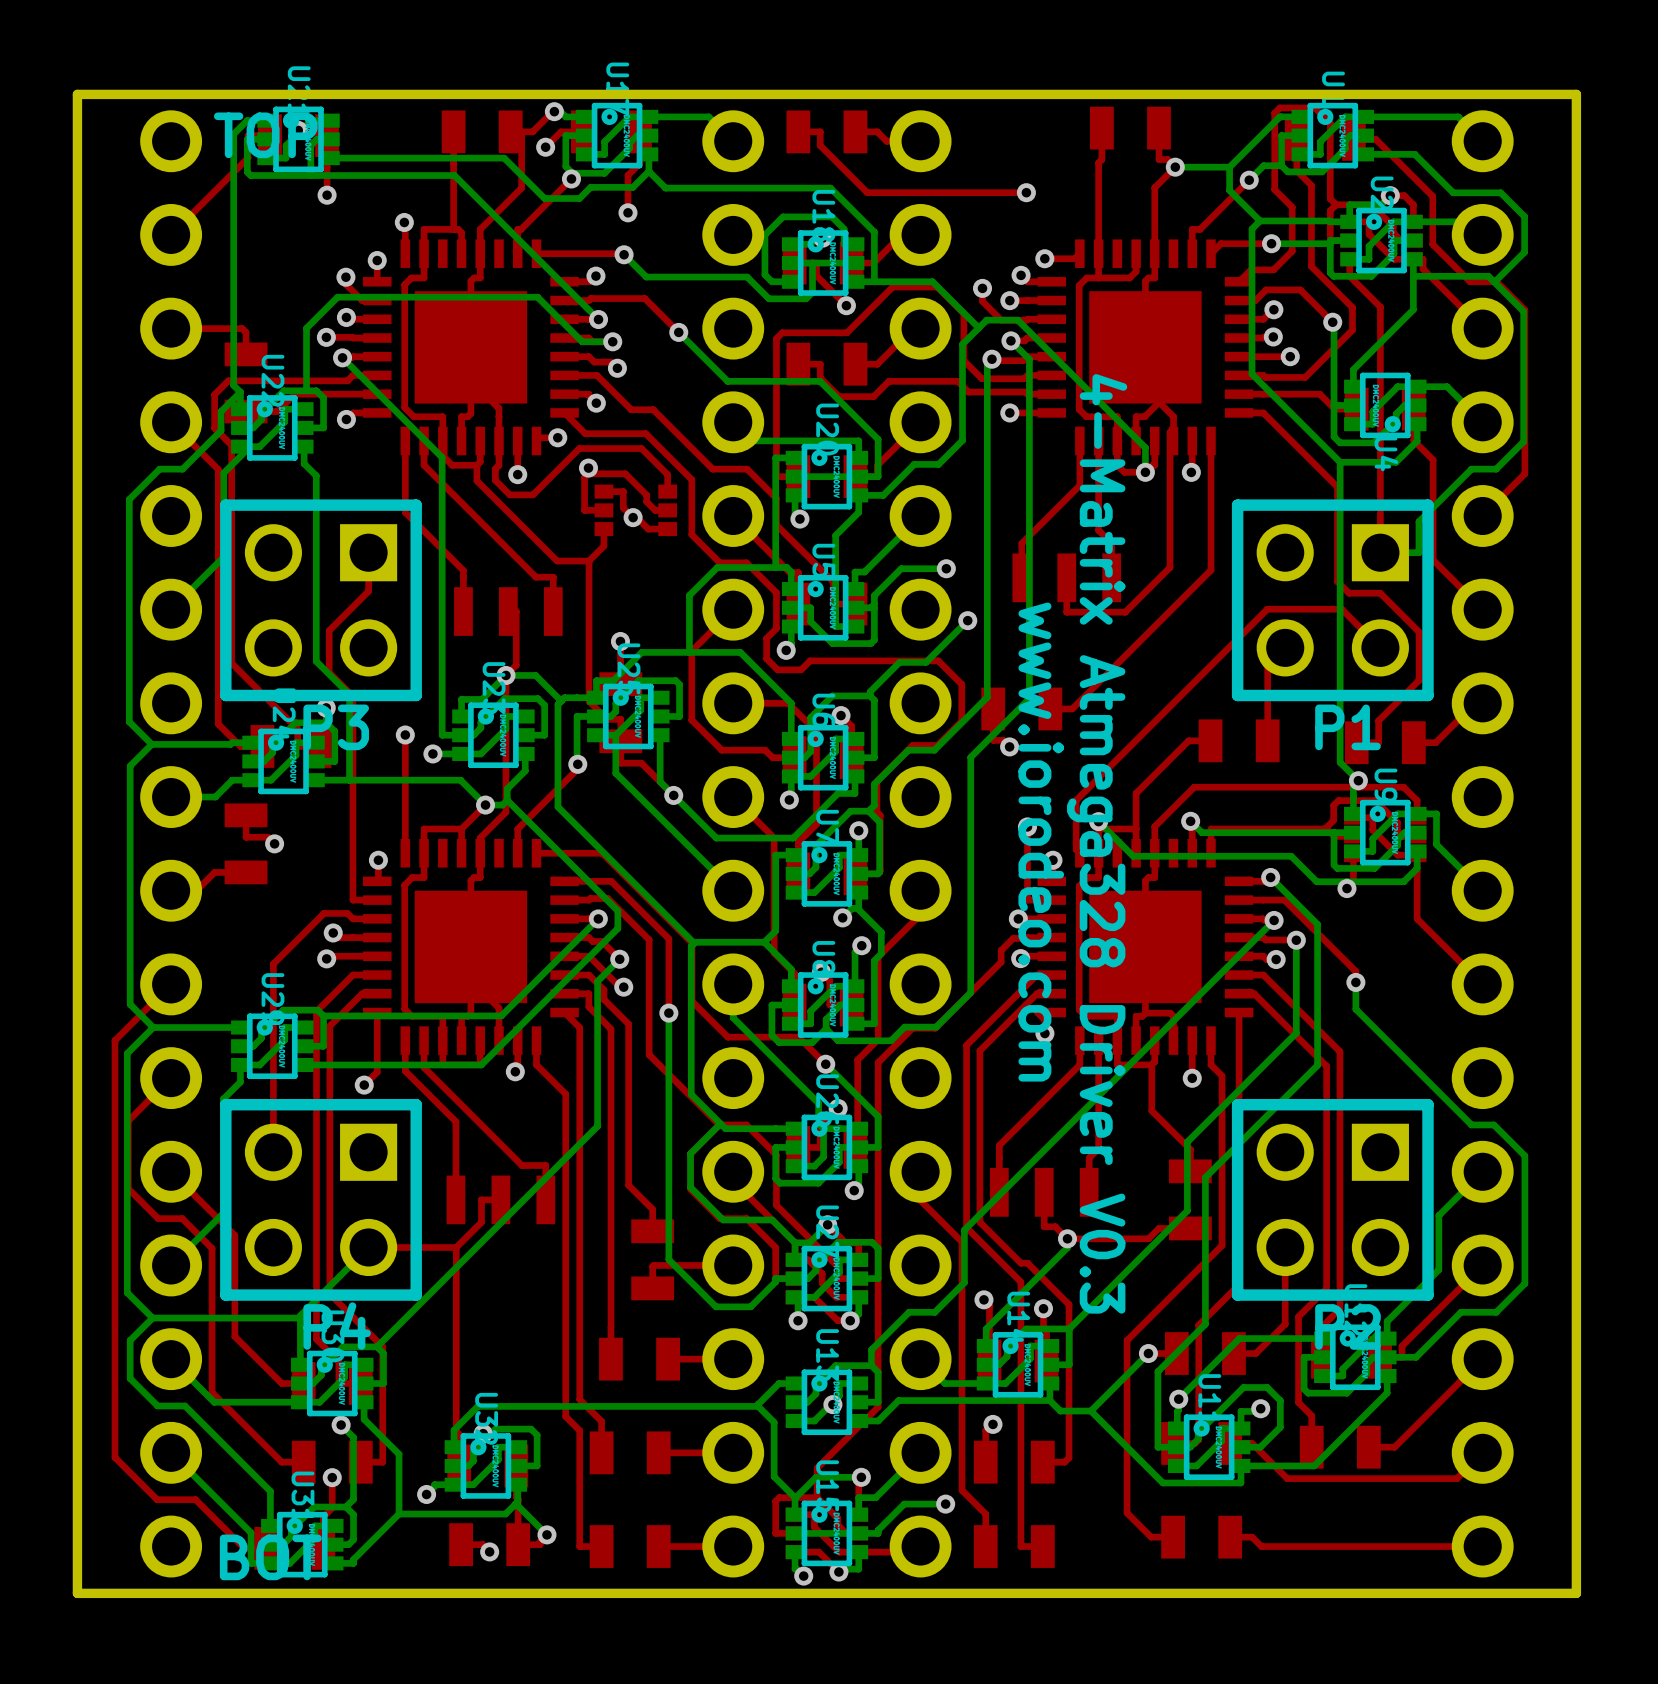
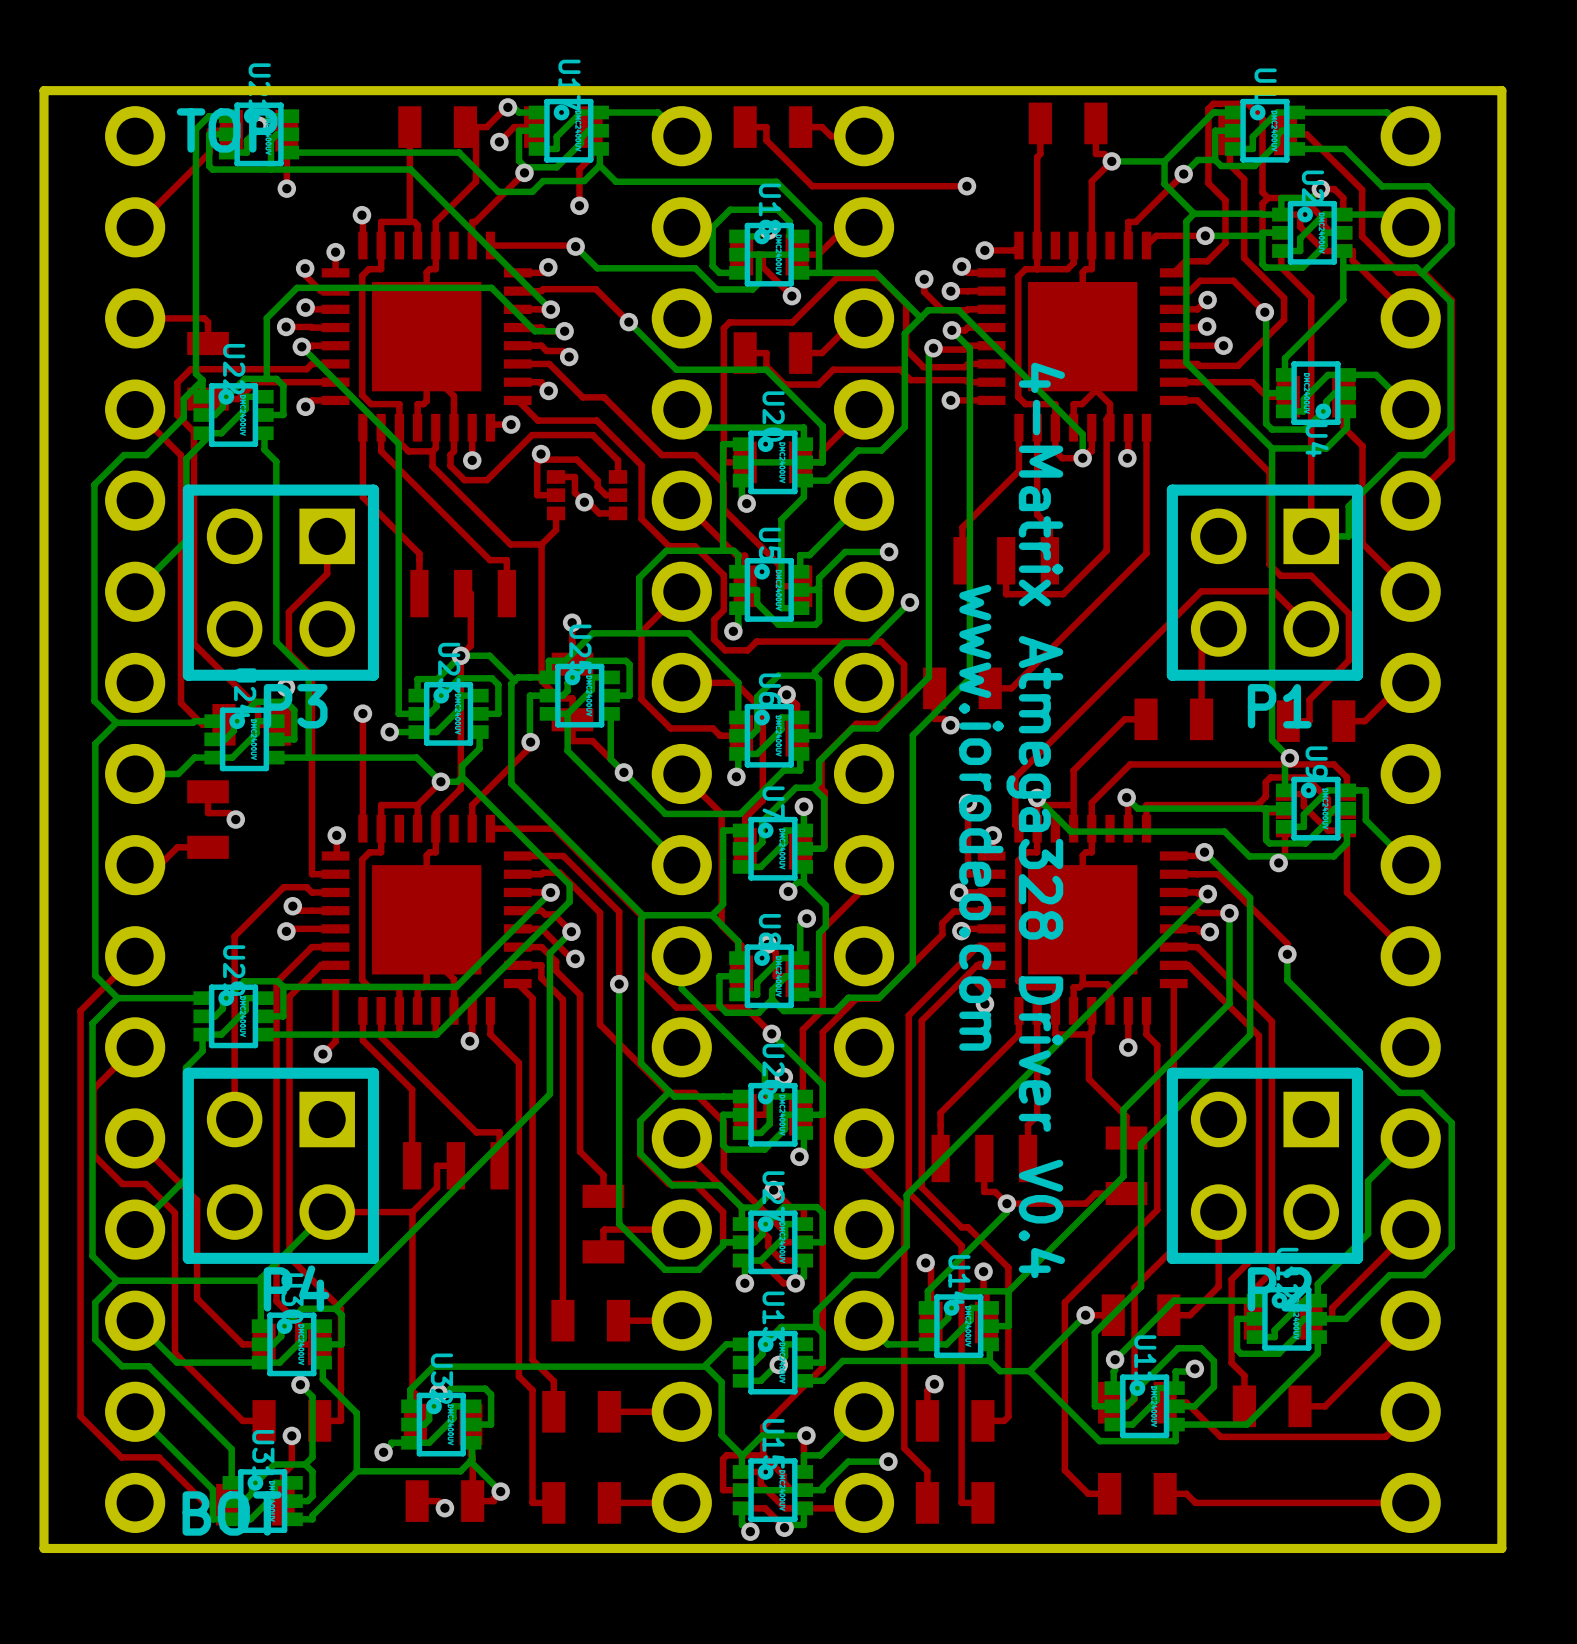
text: 4-Matrix Atmega328 Driver V0.3 (1097, 843) -> 4-Matrix Atmega328 Driver V0.4 (1035, 820)

